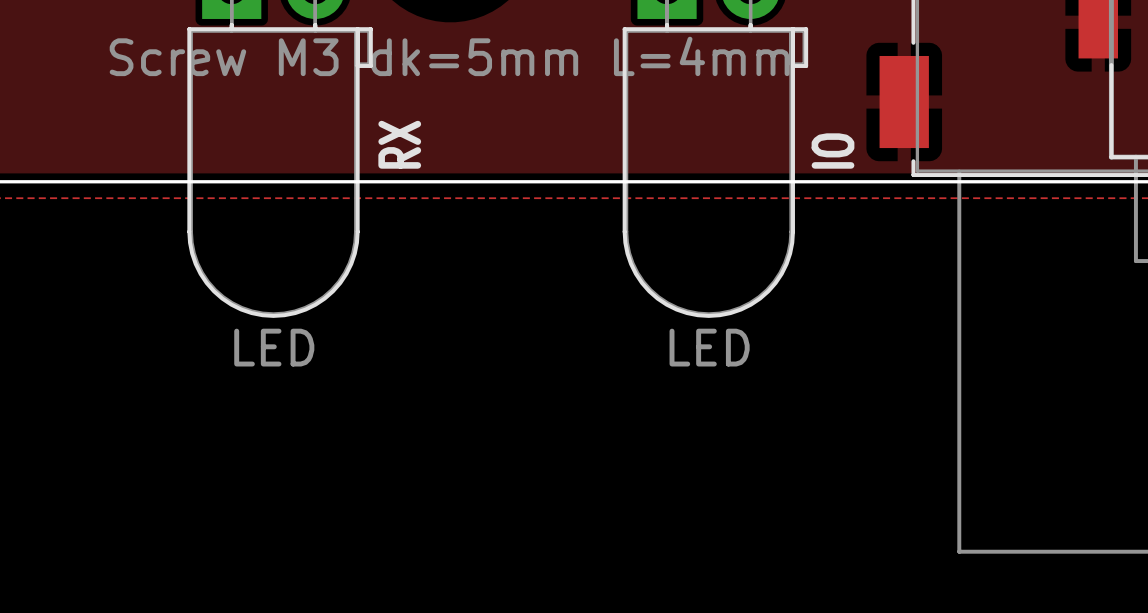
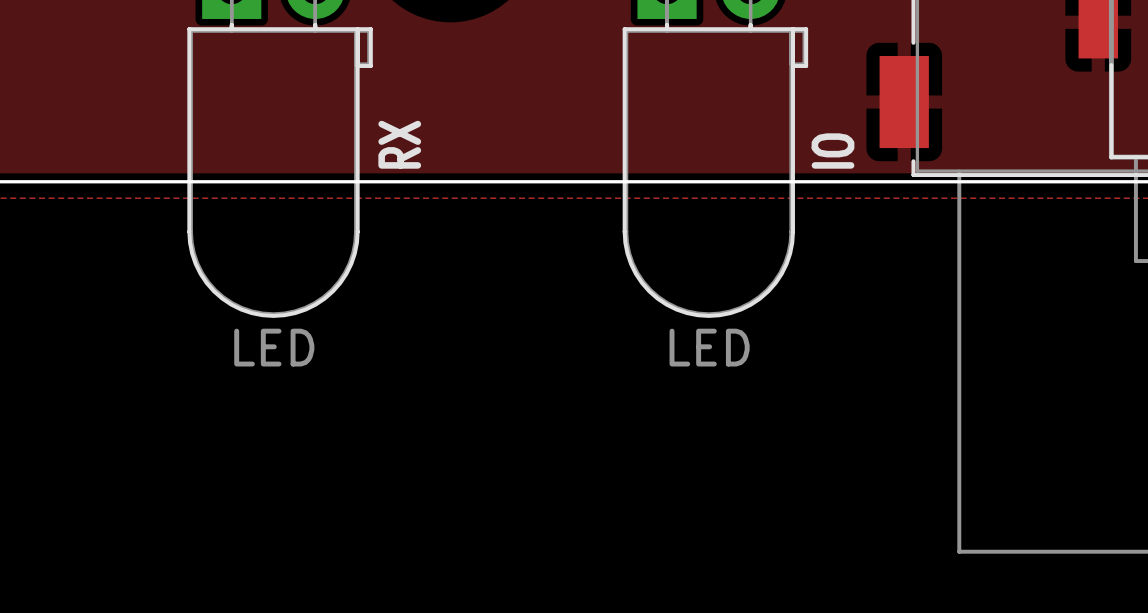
part value: Screw M3 dk=5mm L=4mm (449, 56) -> none

